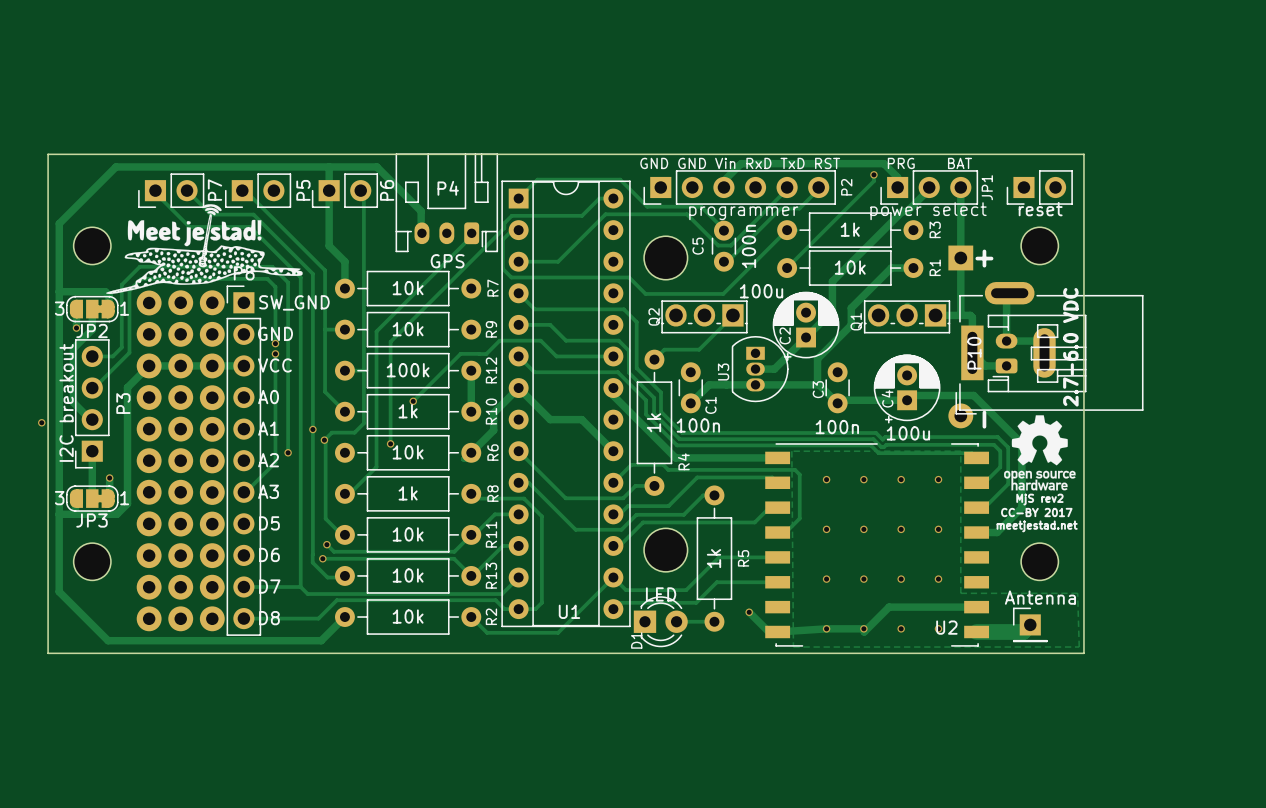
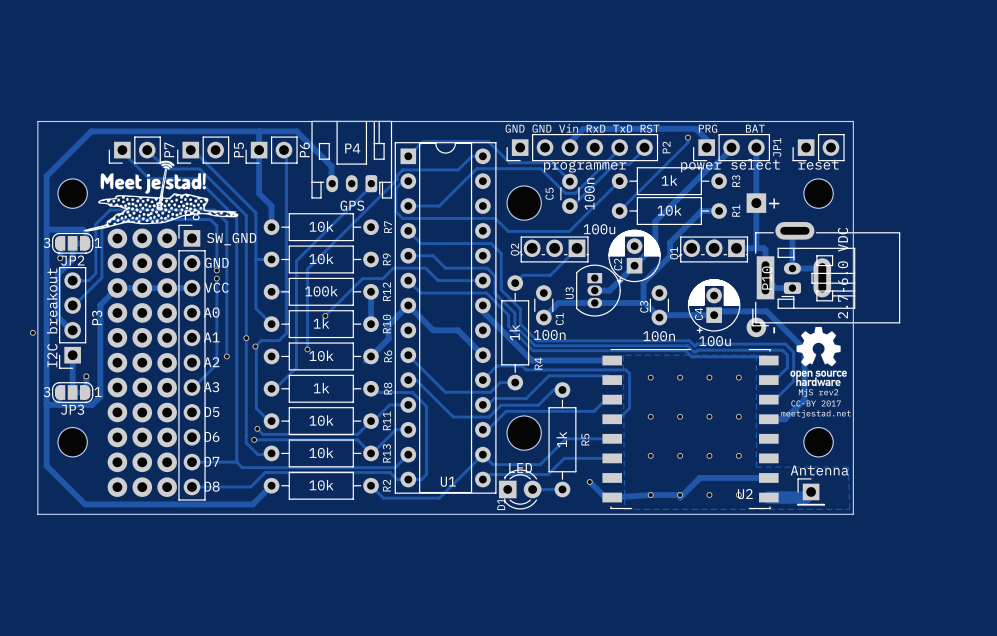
JP2 footprint: [66, 295, 119, 323] -> [52, 232, 94, 254]
JP3 footprint: [66, 485, 119, 512] -> [52, 382, 94, 403]

